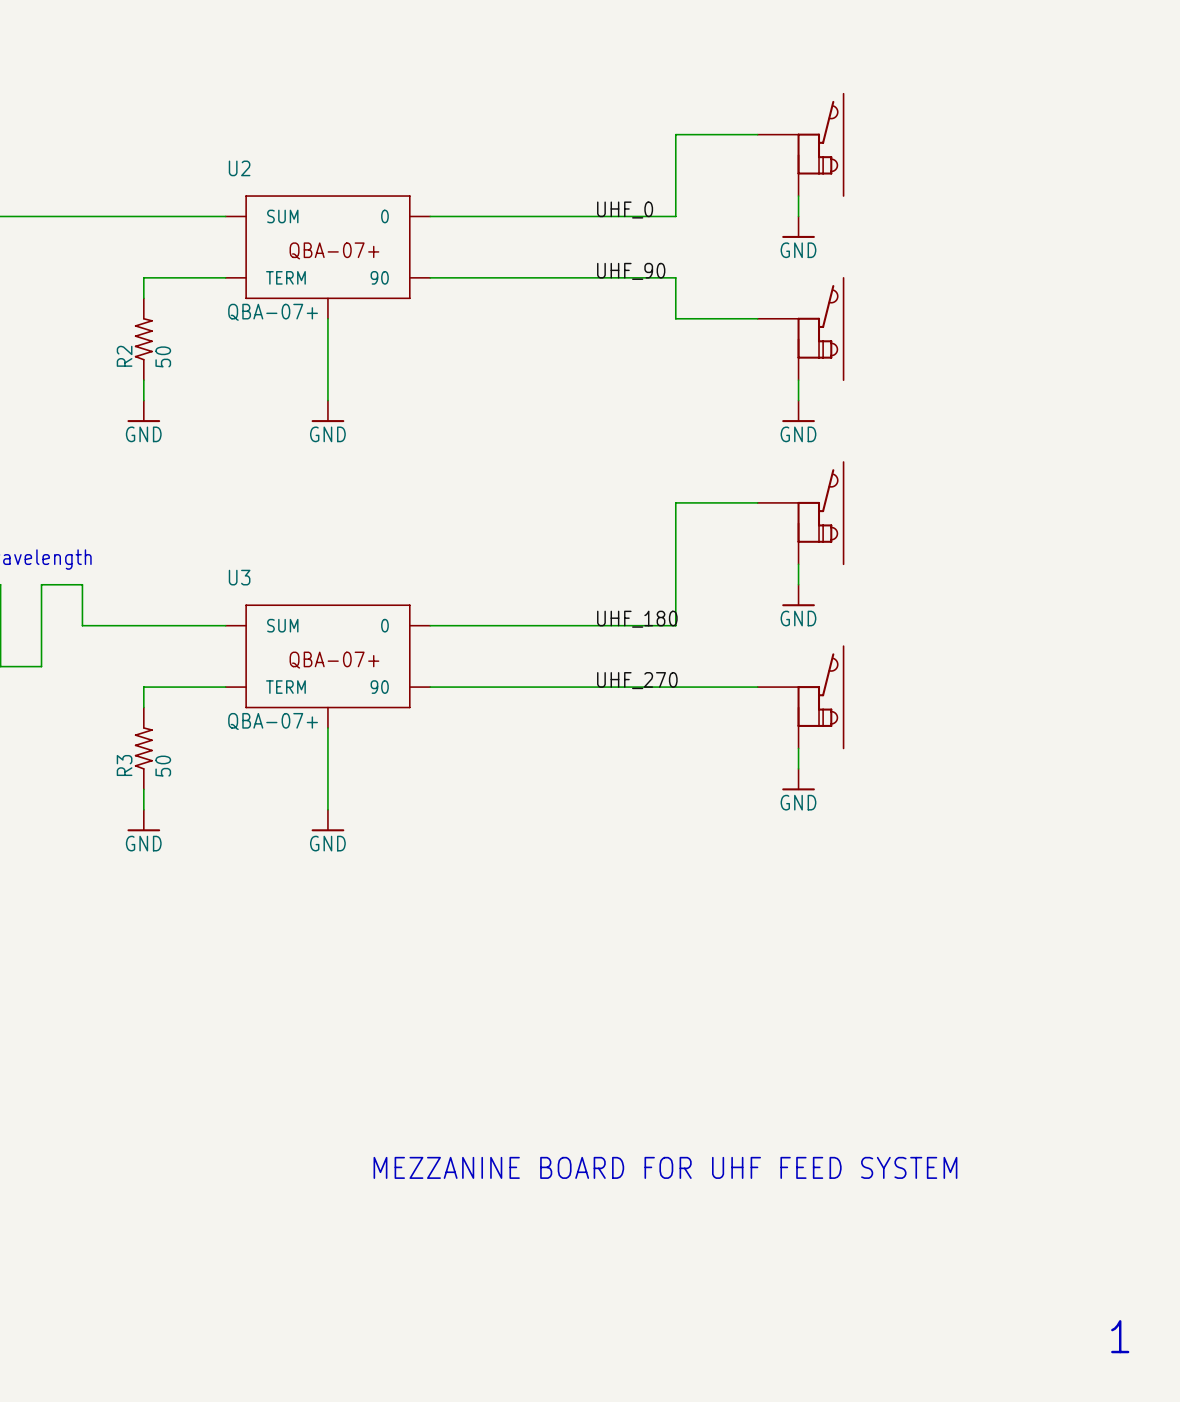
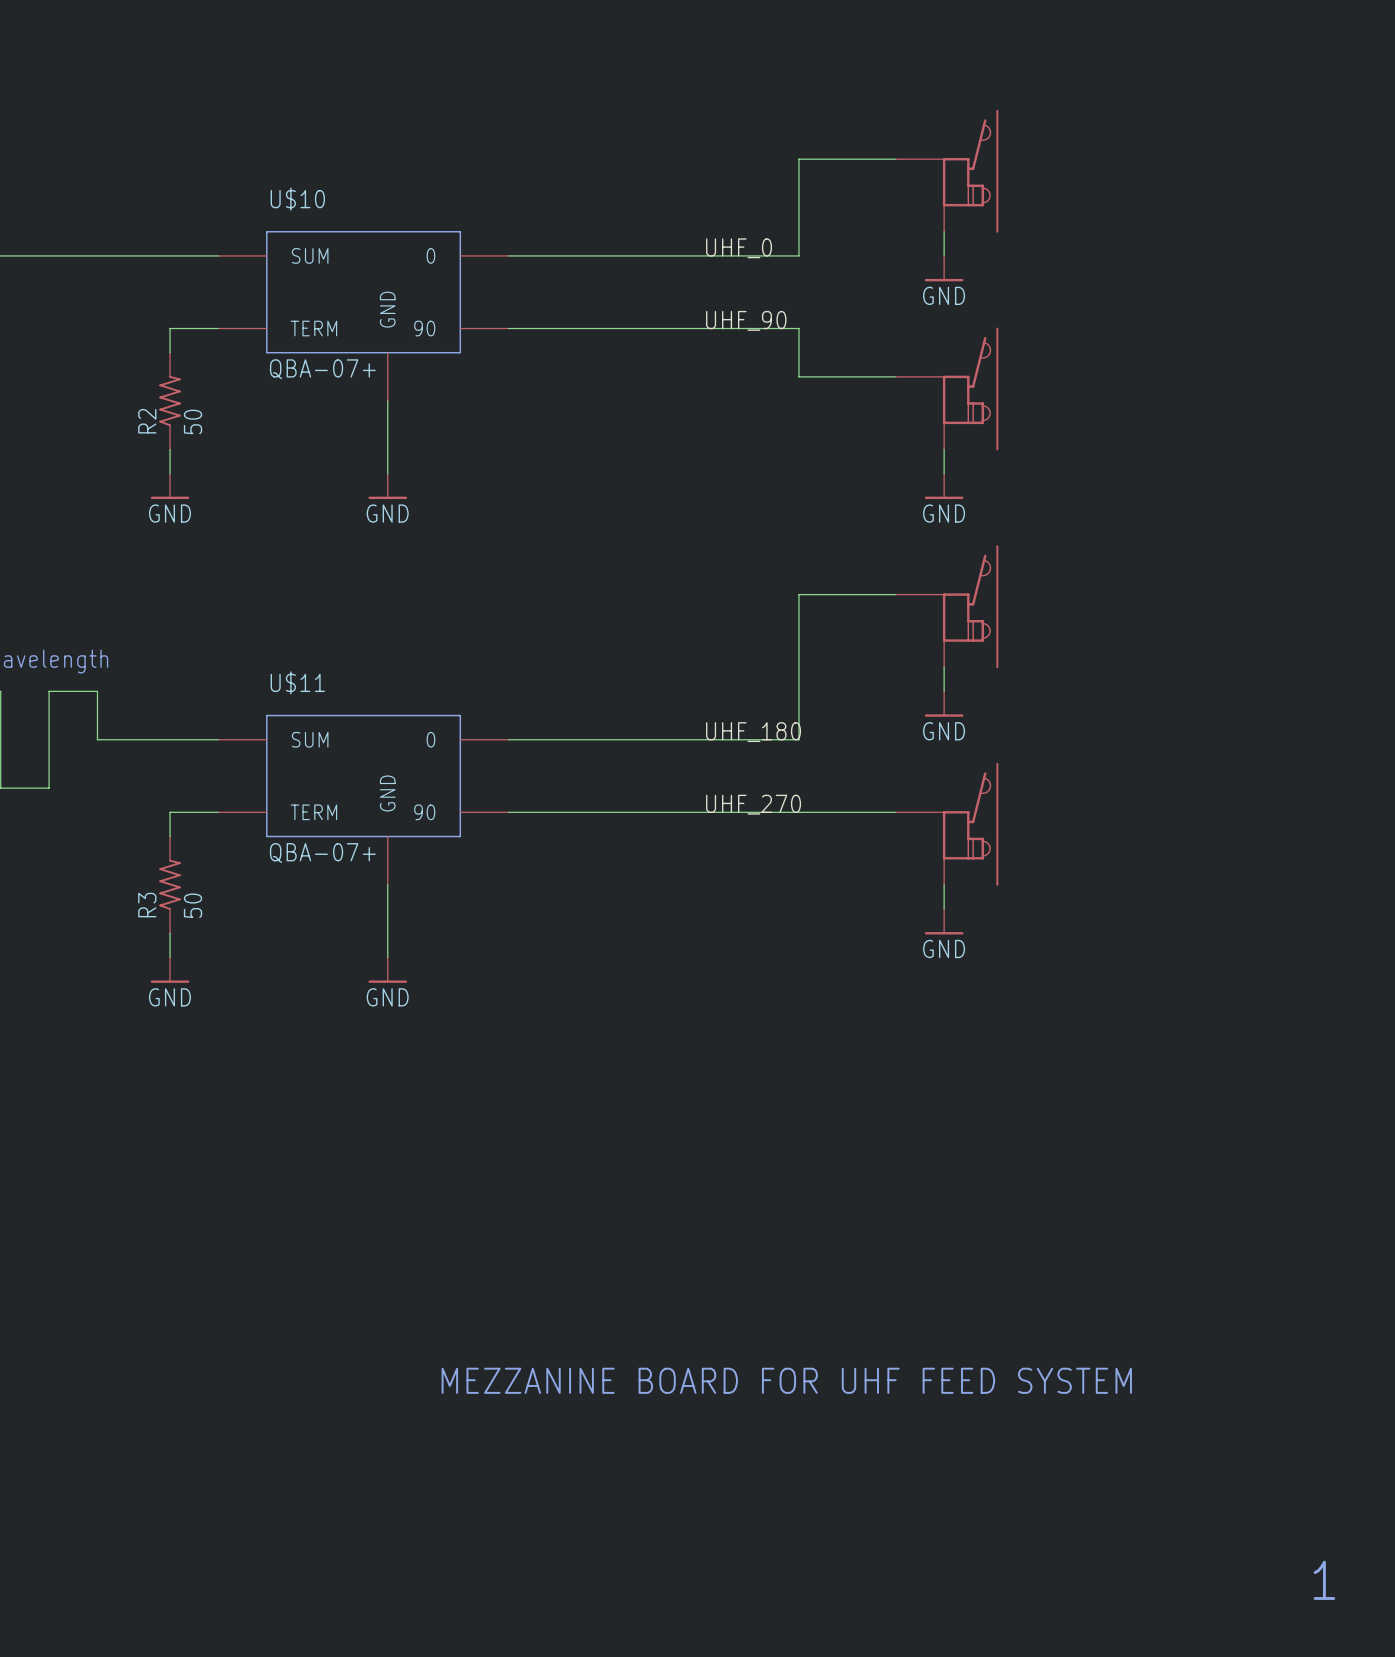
U2: QBA-07+ (327, 257) -> none
U$10: none -> QBA-07+ (363, 316)
U3: QBA-07+ (327, 666) -> none
U$11: none -> QBA-07+ (363, 799)

